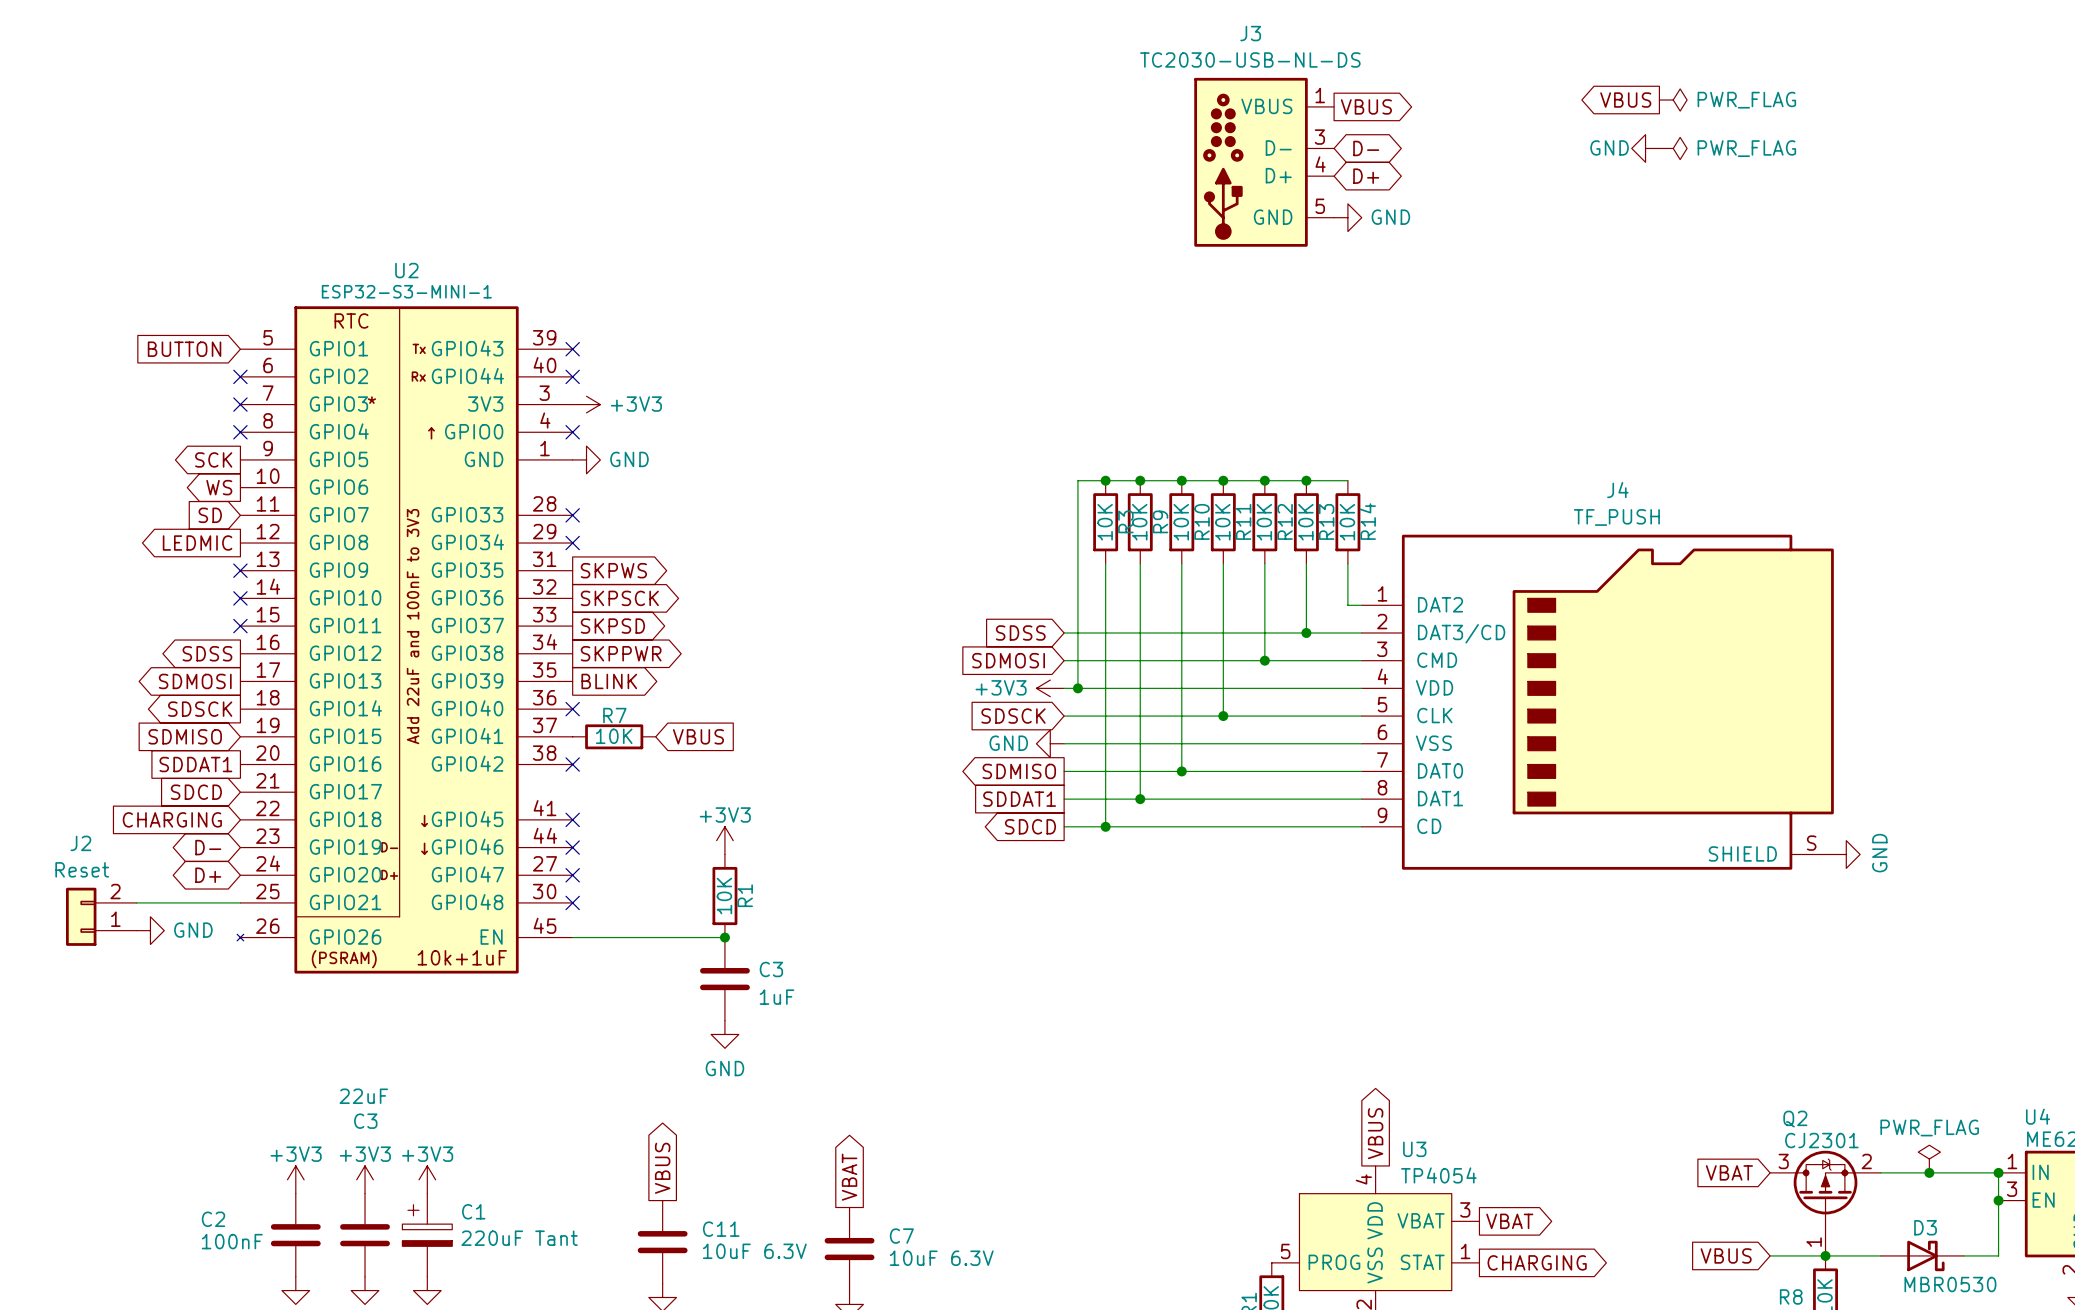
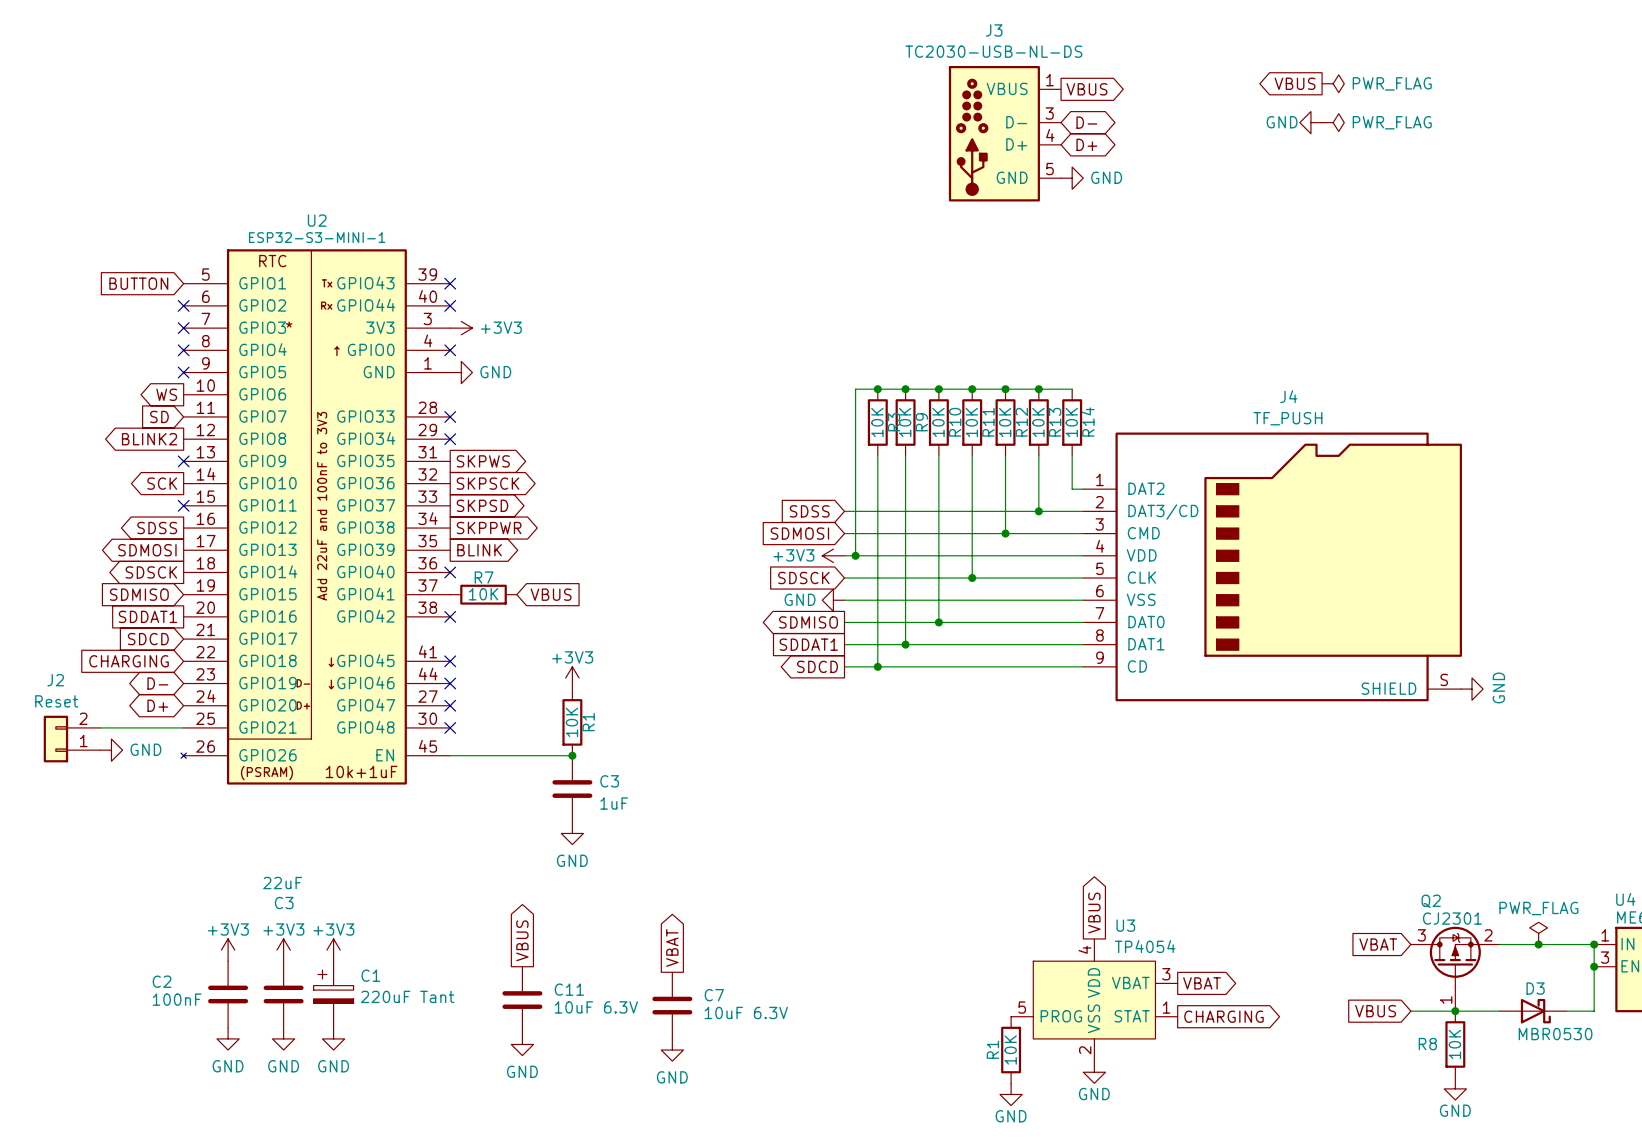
global label position: SCK (213, 459) -> SCK (162, 483)
no-connect mark: none -> (183, 372)
global label: LEDMIC (197, 543) -> BLINK2 (149, 439)
no-connect mark: (240, 598) -> none

